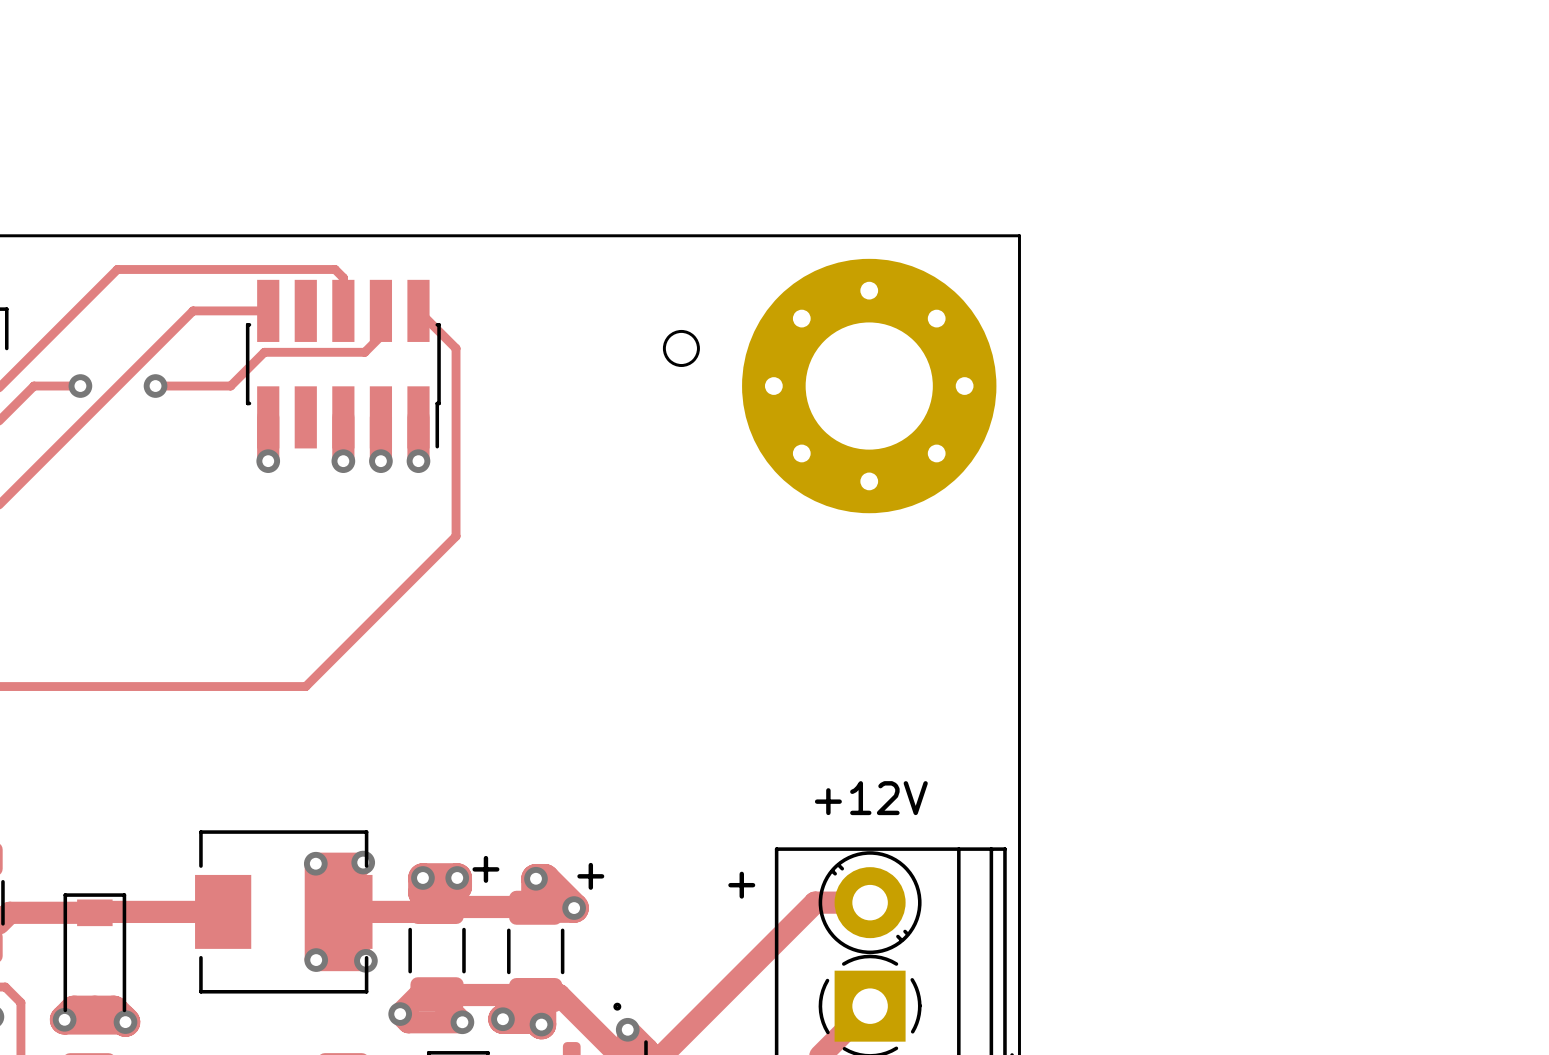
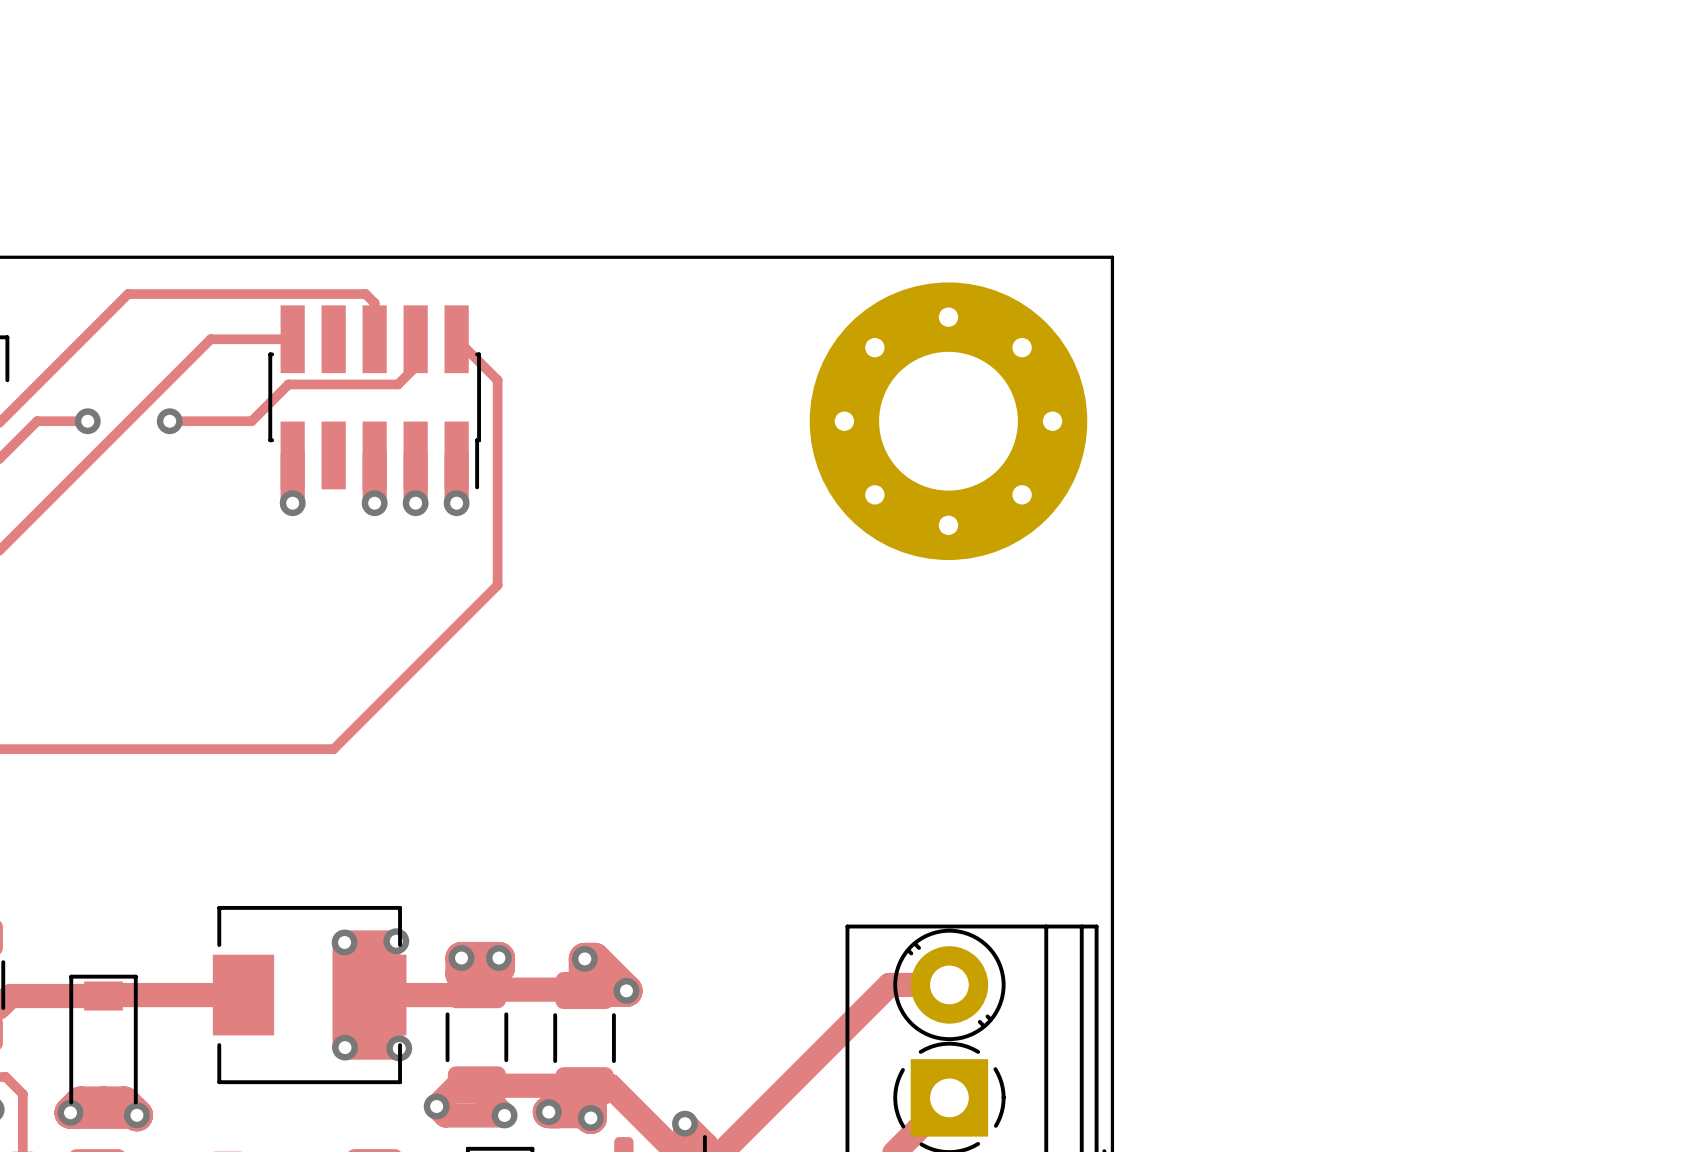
round board edge: [662, 329, 700, 367] -> none
text: +12V (871, 798) -> none
text: + (485, 869) -> none
text: + (590, 876) -> none
text: + (741, 885) -> none
drawing: [613, 1002, 622, 1011] -> none

